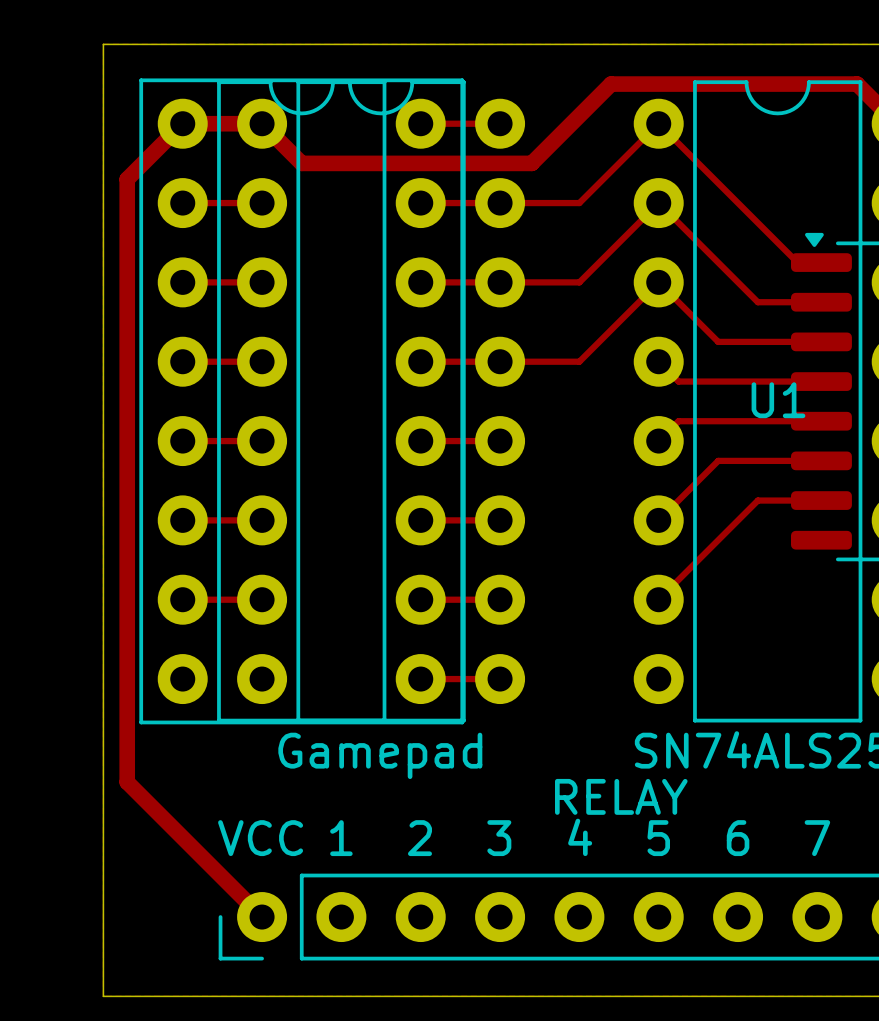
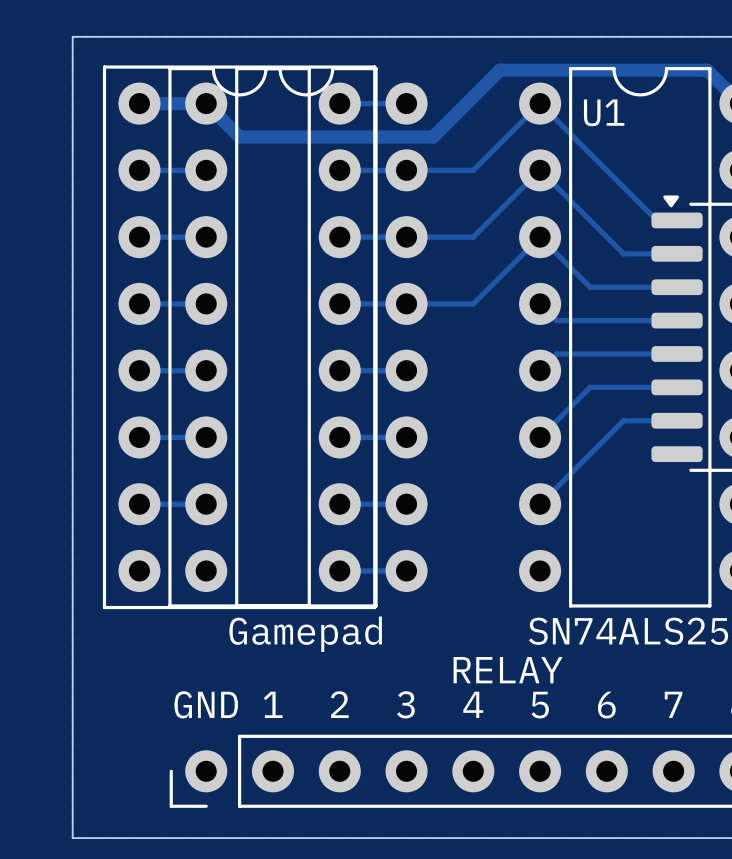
track: (182, 123) (127, 179) (127, 782) (262, 917) -> none
U1 name position: U1 (778, 400) -> U1 (604, 112)
text: VCC (260, 838) -> GND (206, 704)

